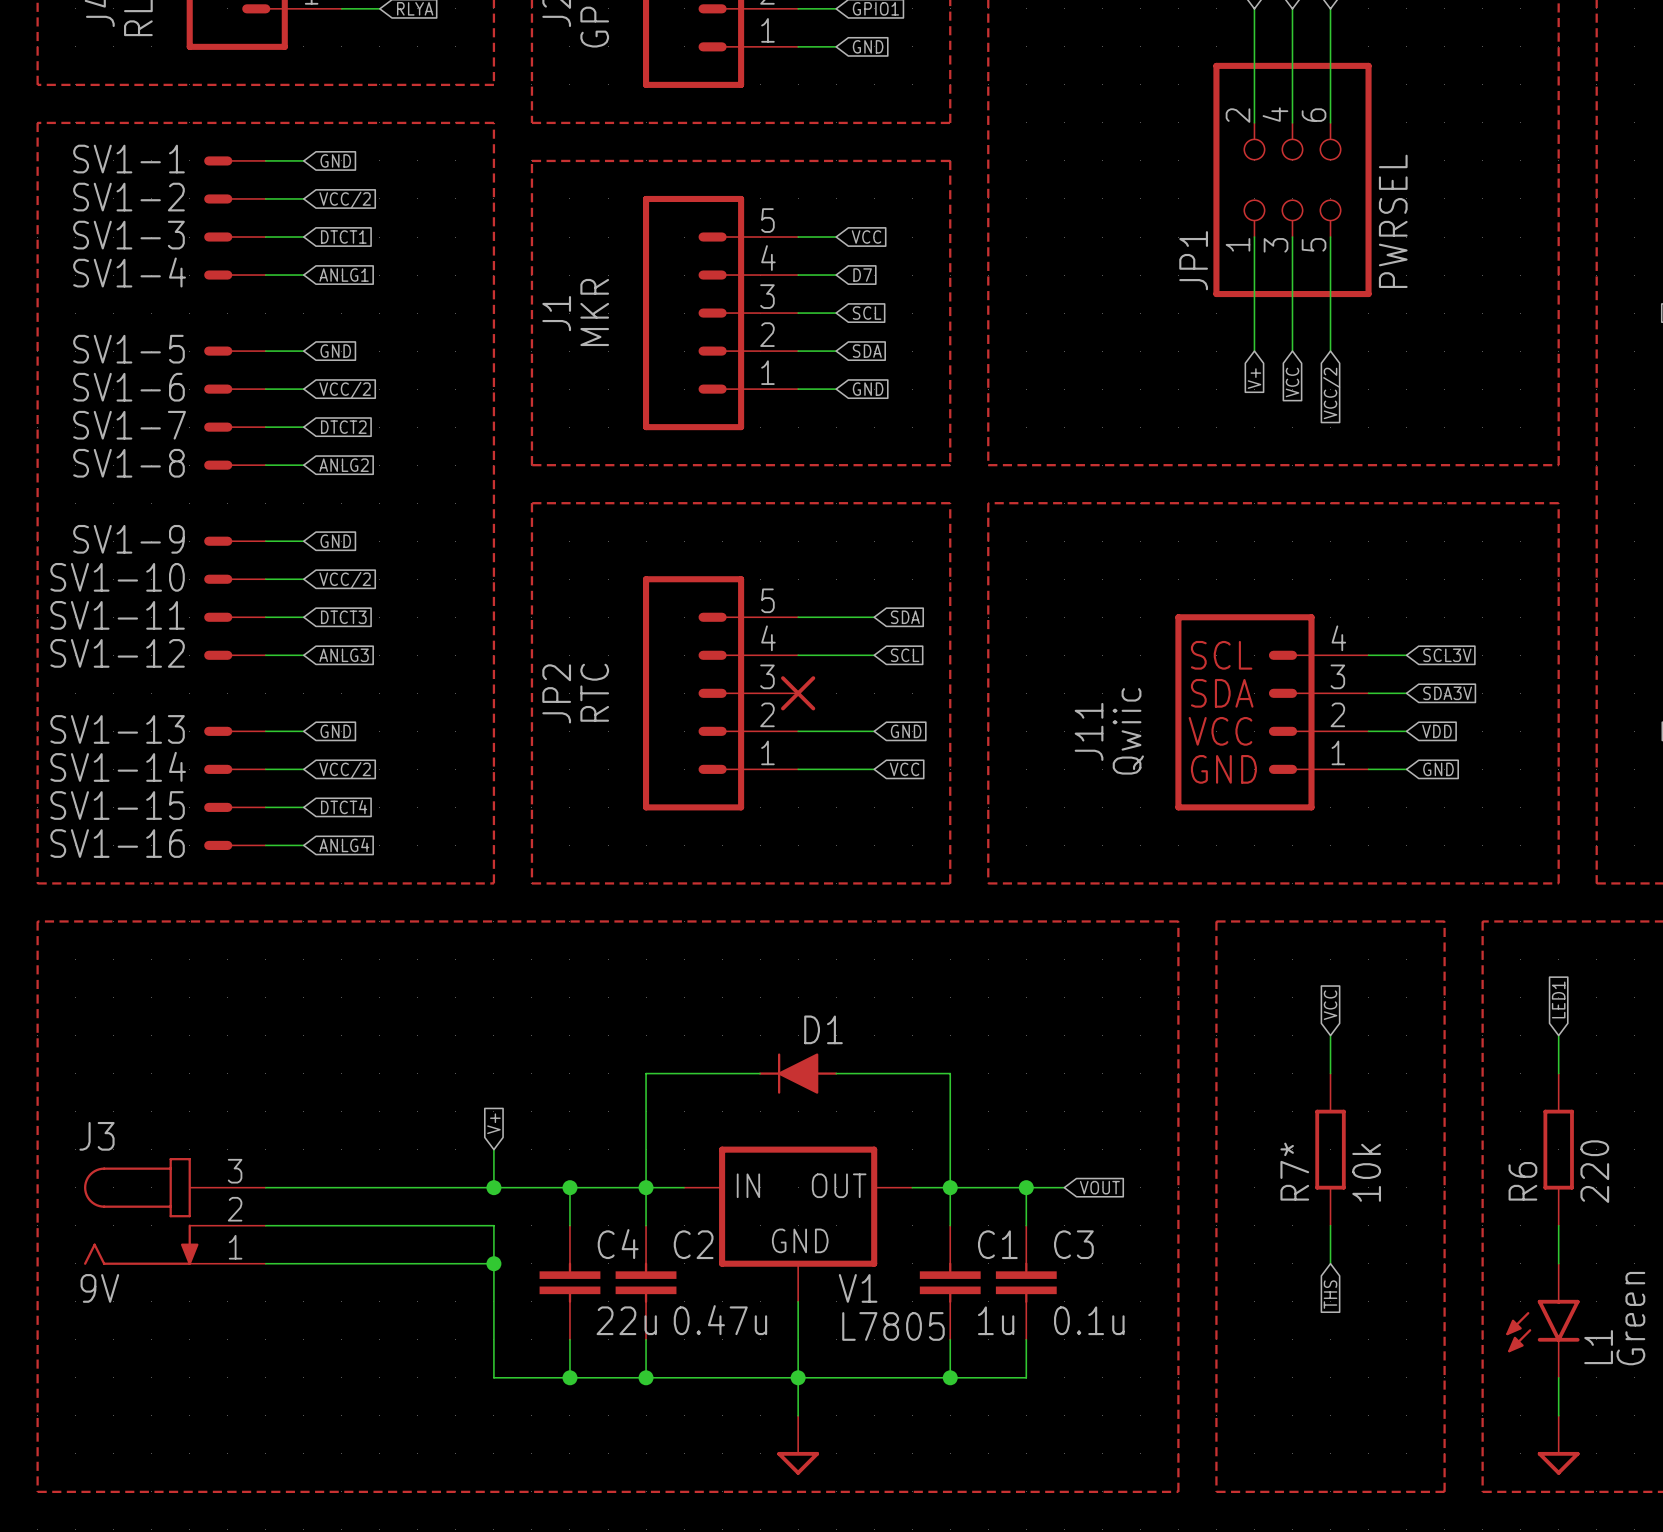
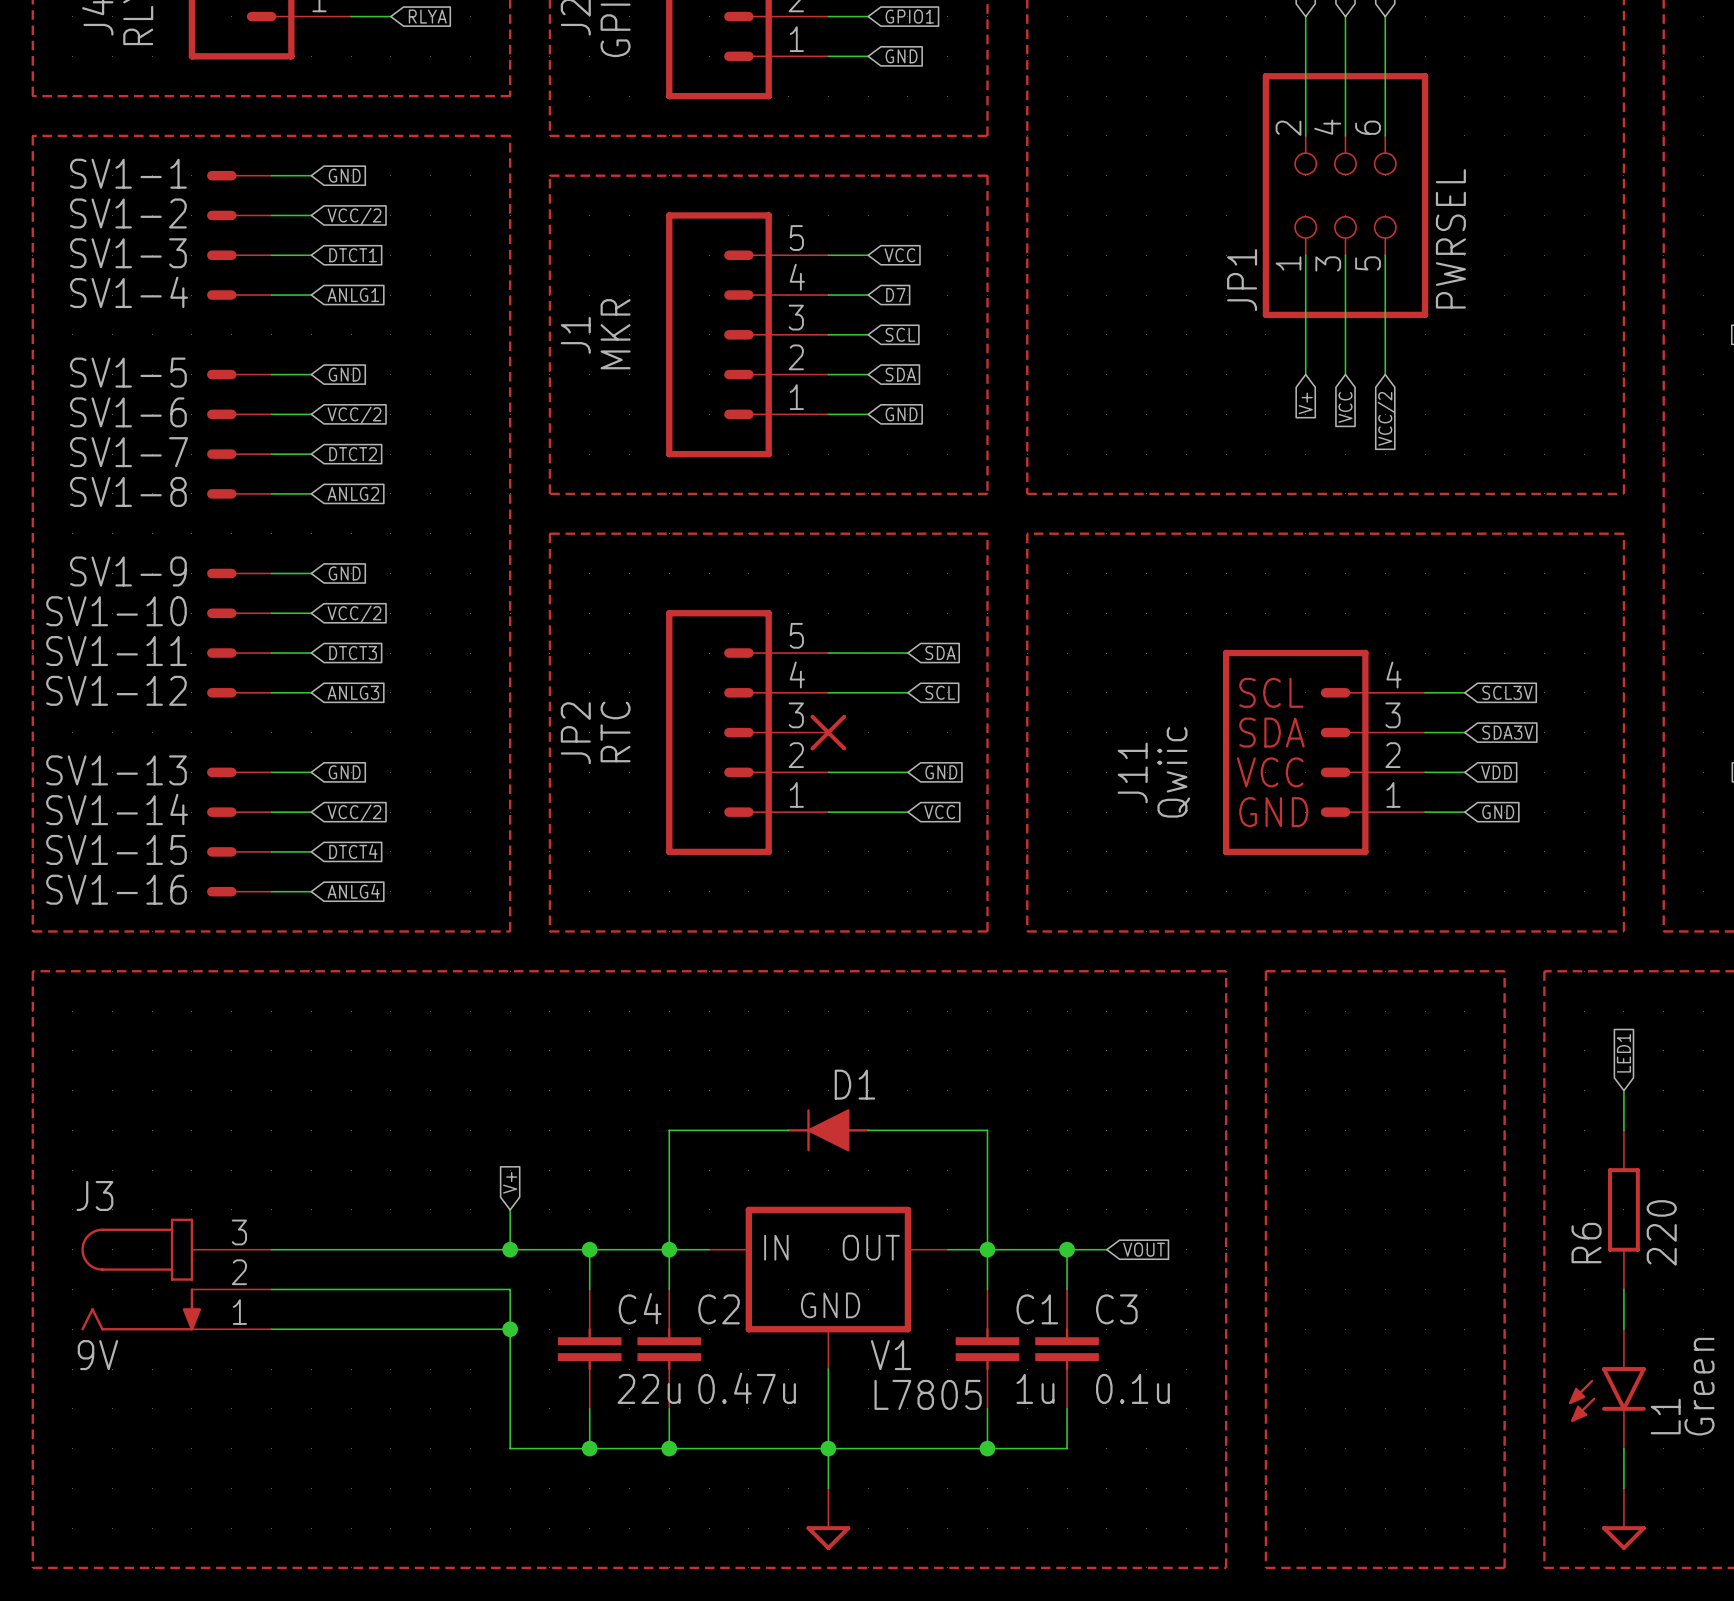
global label: VCC (1330, 1005) -> none
wire: (1330, 1035) (1330, 1073) -> none
R7*: 10k (1330, 1149) -> none
wire: (1330, 1225) (1330, 1263) -> none
global label: THS (1330, 1294) -> none

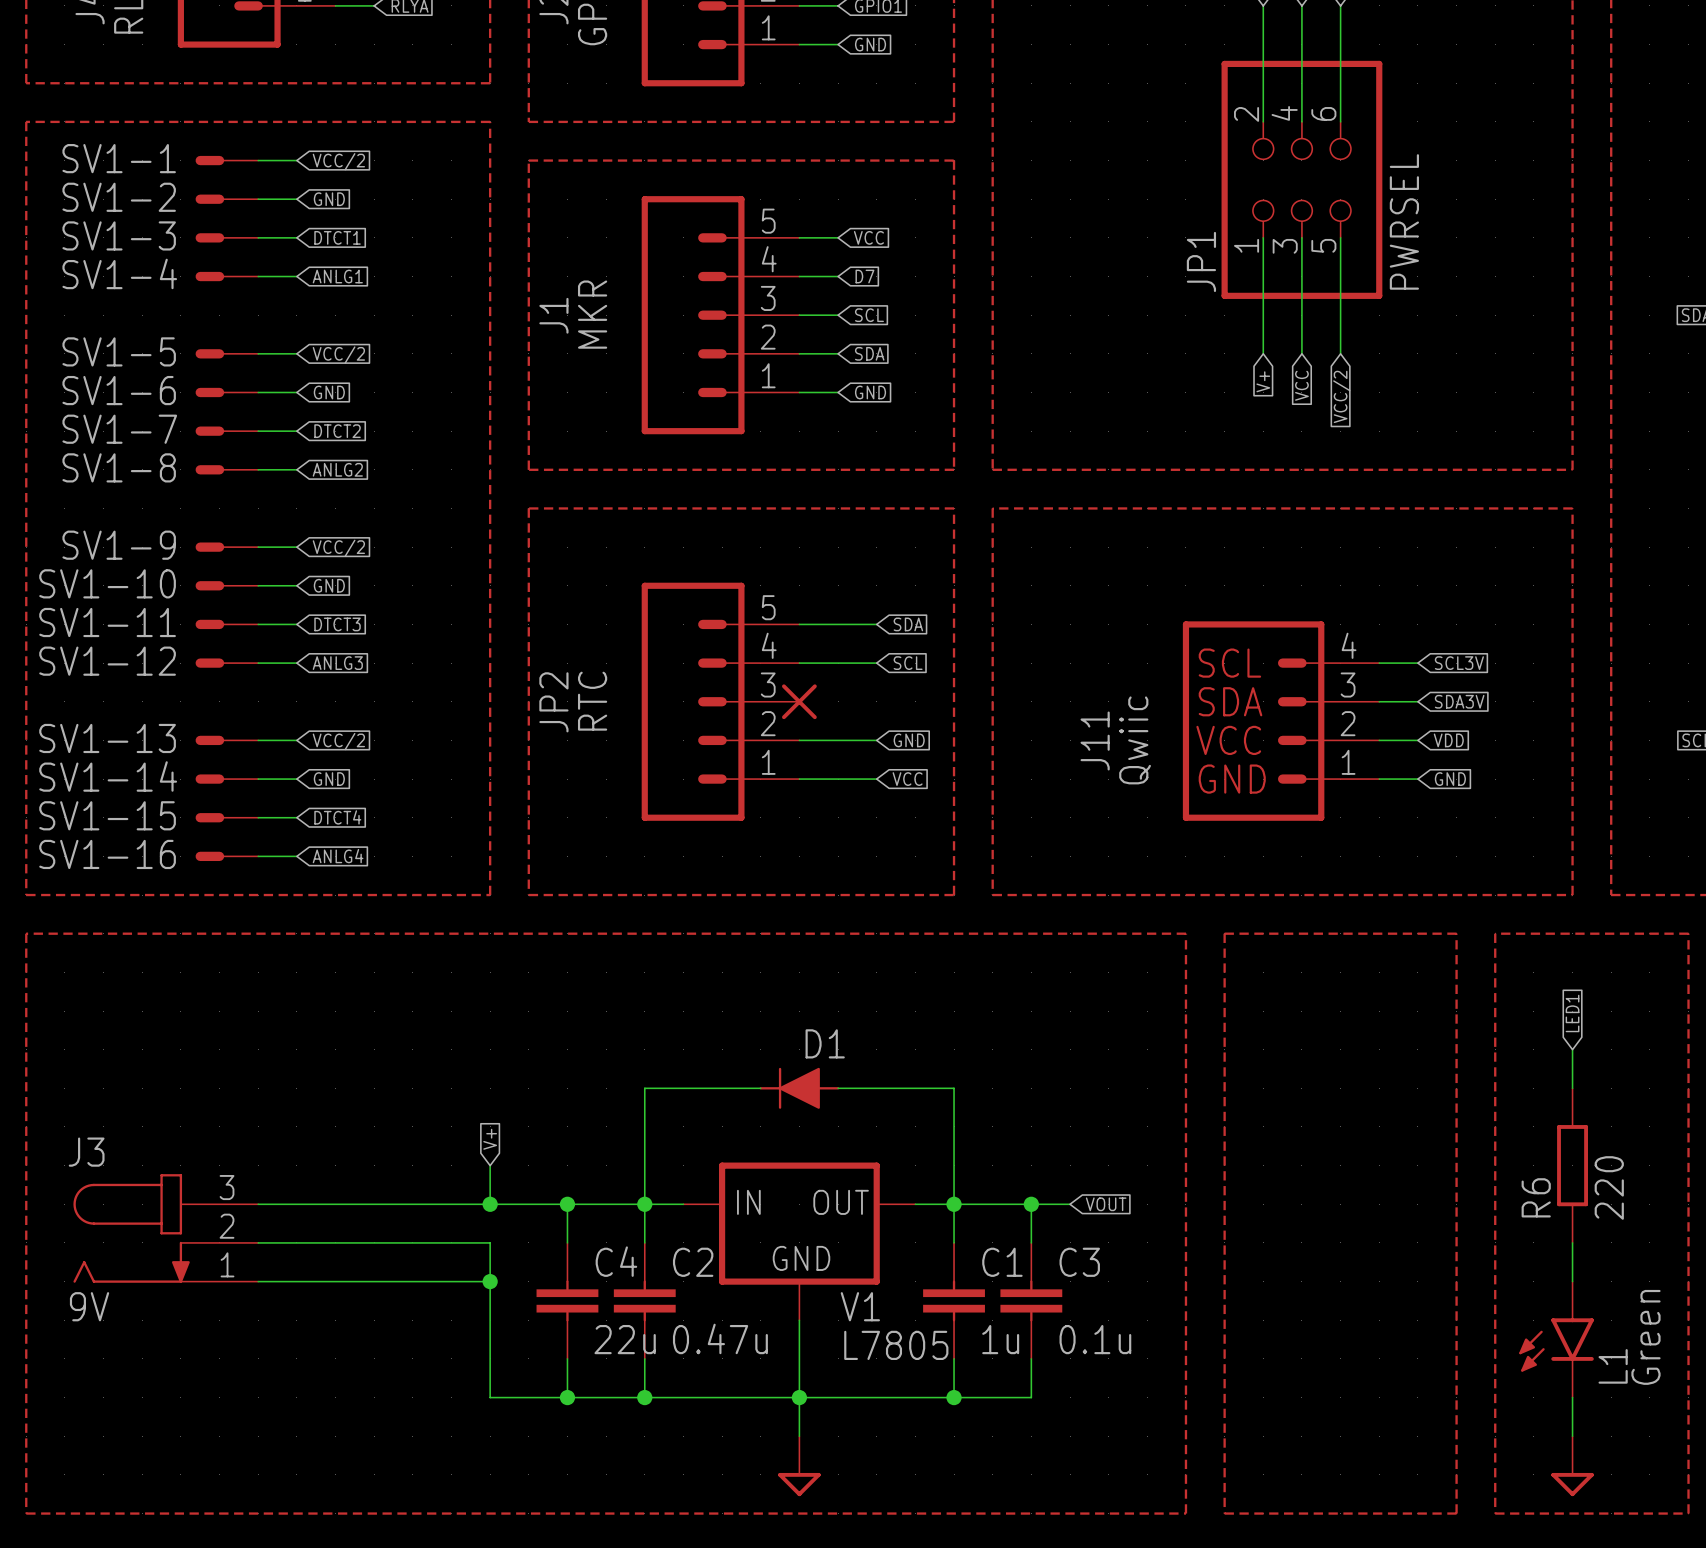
global label: GND (344, 175) -> VCC/2 (338, 161)
global label: VCC/2 (354, 216) -> GND (329, 199)
global label: GND (344, 374) -> VCC/2 (338, 355)
global label: VCC/2 (354, 415) -> GND (329, 392)
global label: GND (344, 573) -> VCC/2 (338, 548)
global label: VCC/2 (354, 614) -> GND (329, 585)
global label: GND (344, 772) -> VCC/2 (338, 741)
global label: VCC/2 (354, 813) -> GND (329, 779)

